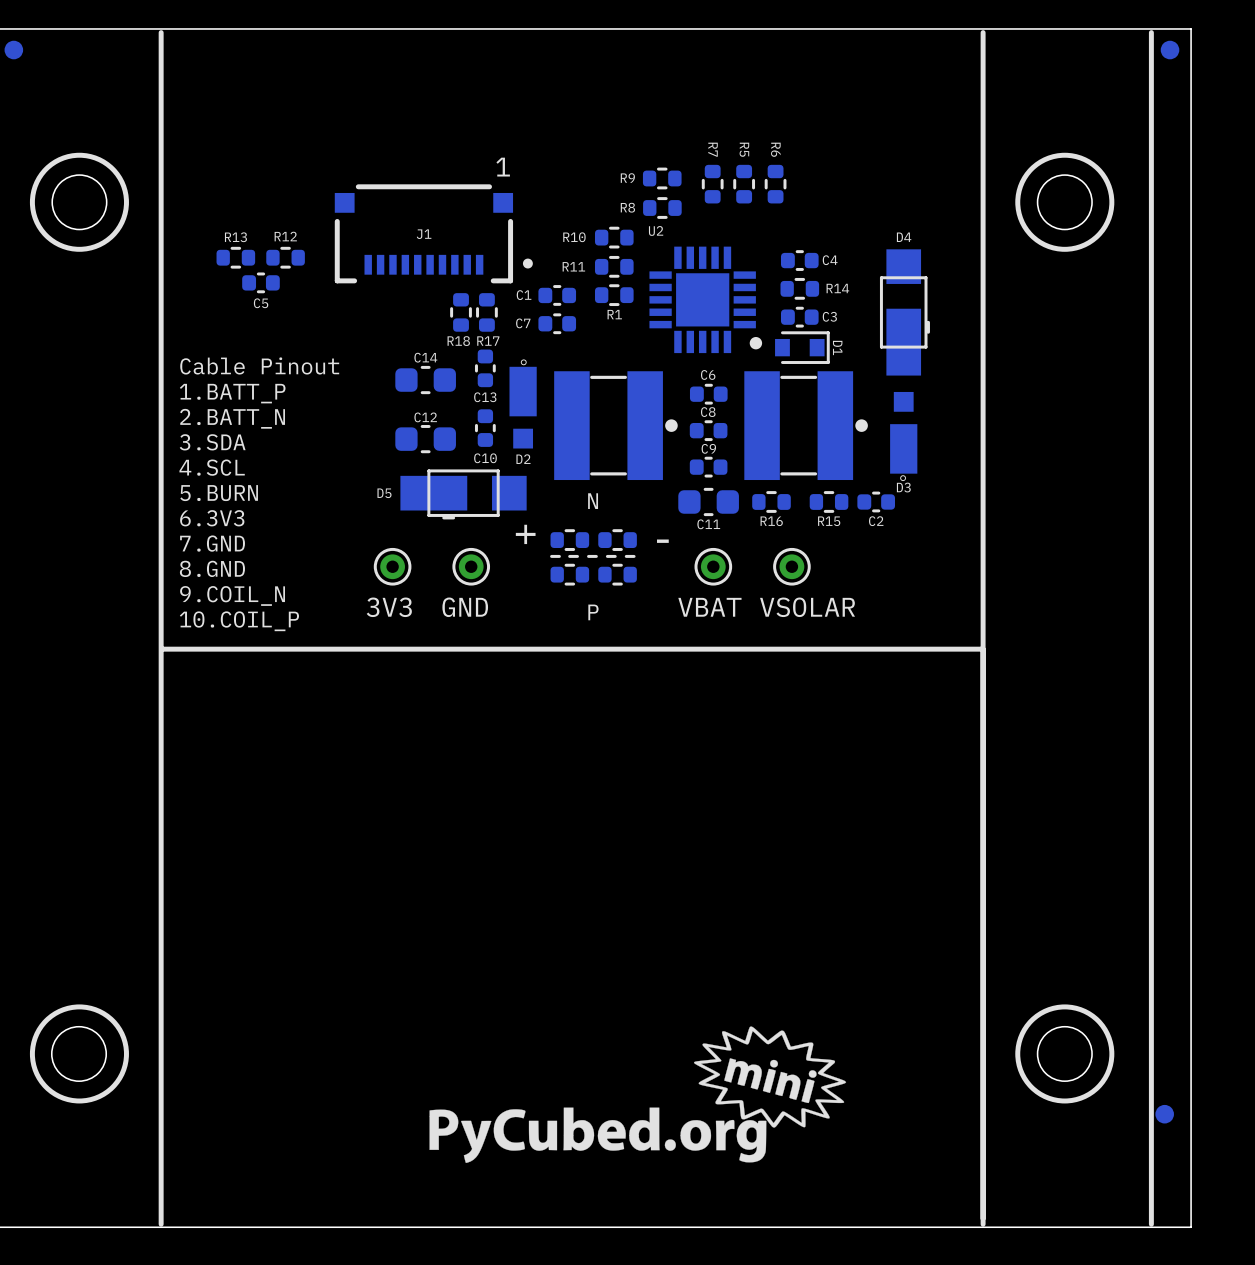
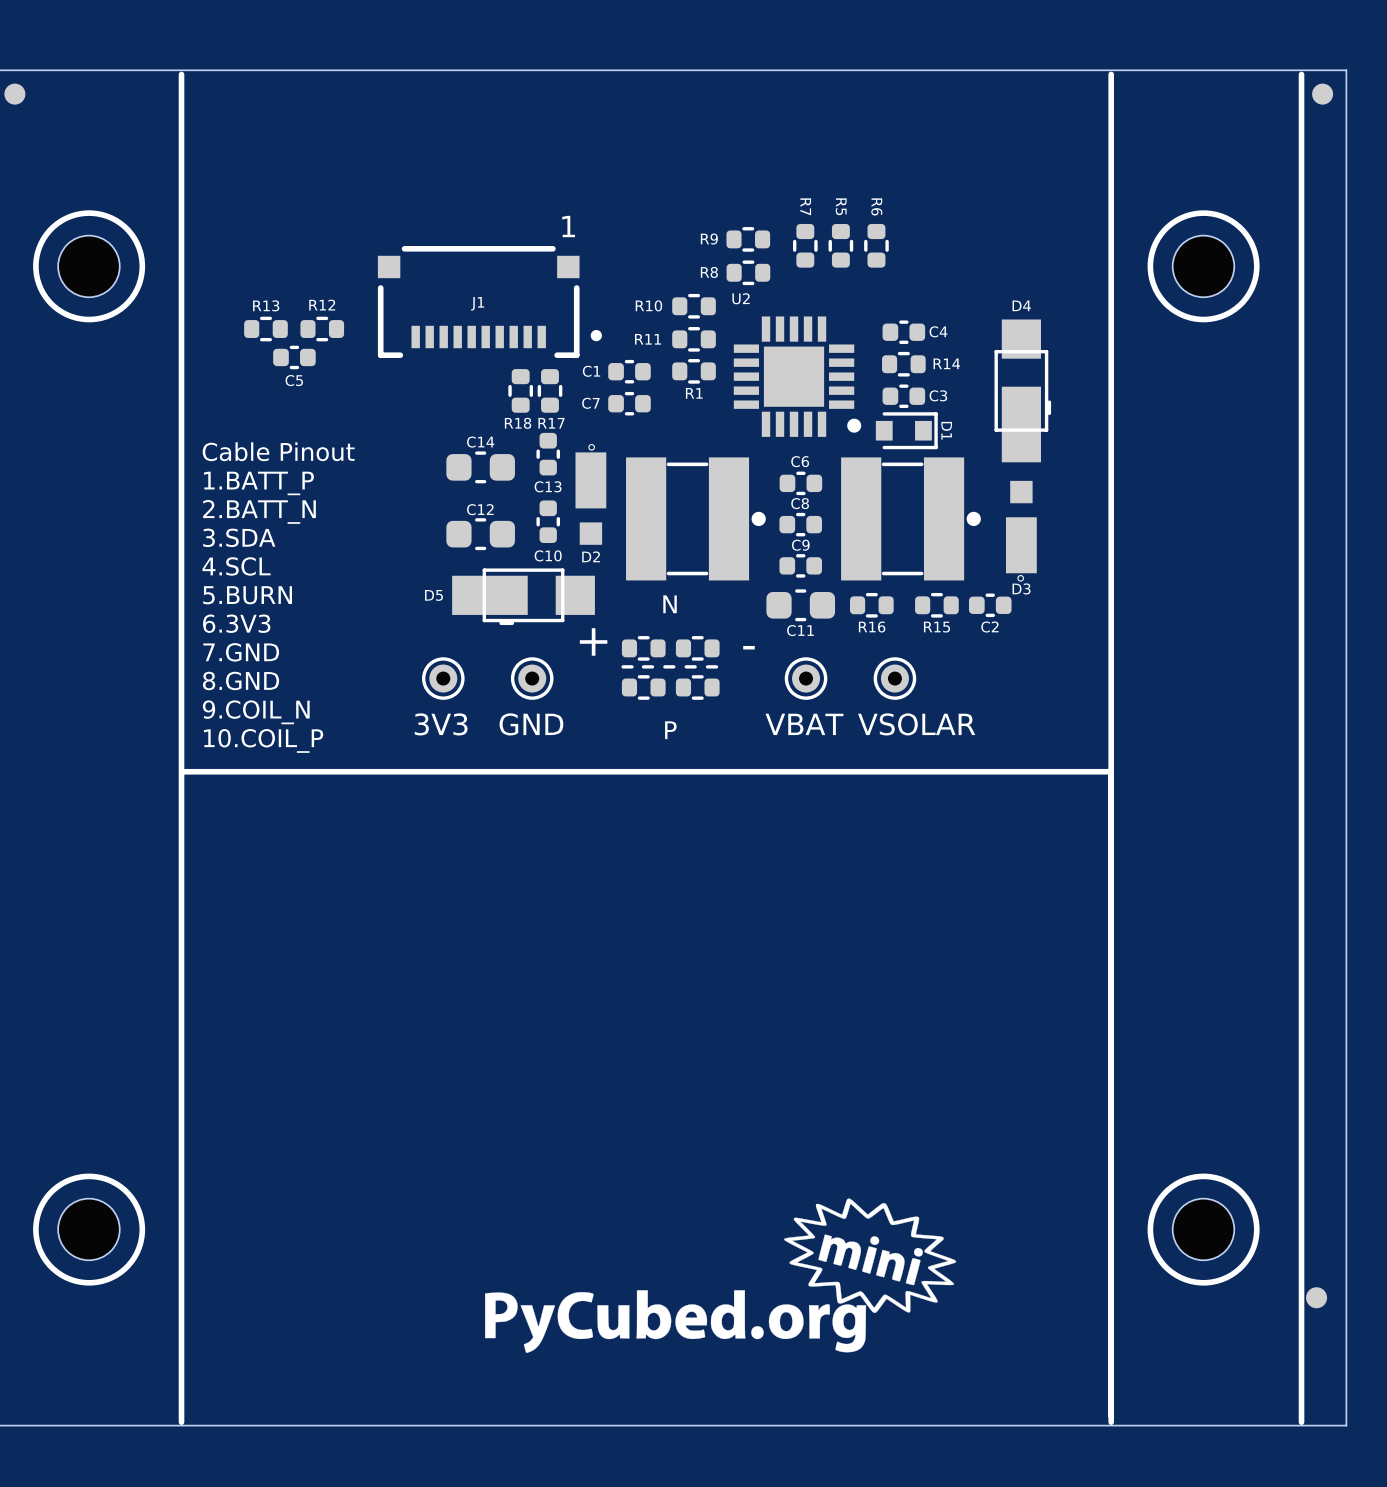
round board edge: [51, 174, 108, 231] -> none
round board edge: [1036, 174, 1093, 231] -> none
part: none -> (88, 266)
part: none -> (1203, 266)
round board edge: [51, 1026, 107, 1082] -> none
round board edge: [1036, 1026, 1093, 1082] -> none
part: none -> (88, 1229)
part: none -> (1203, 1229)

